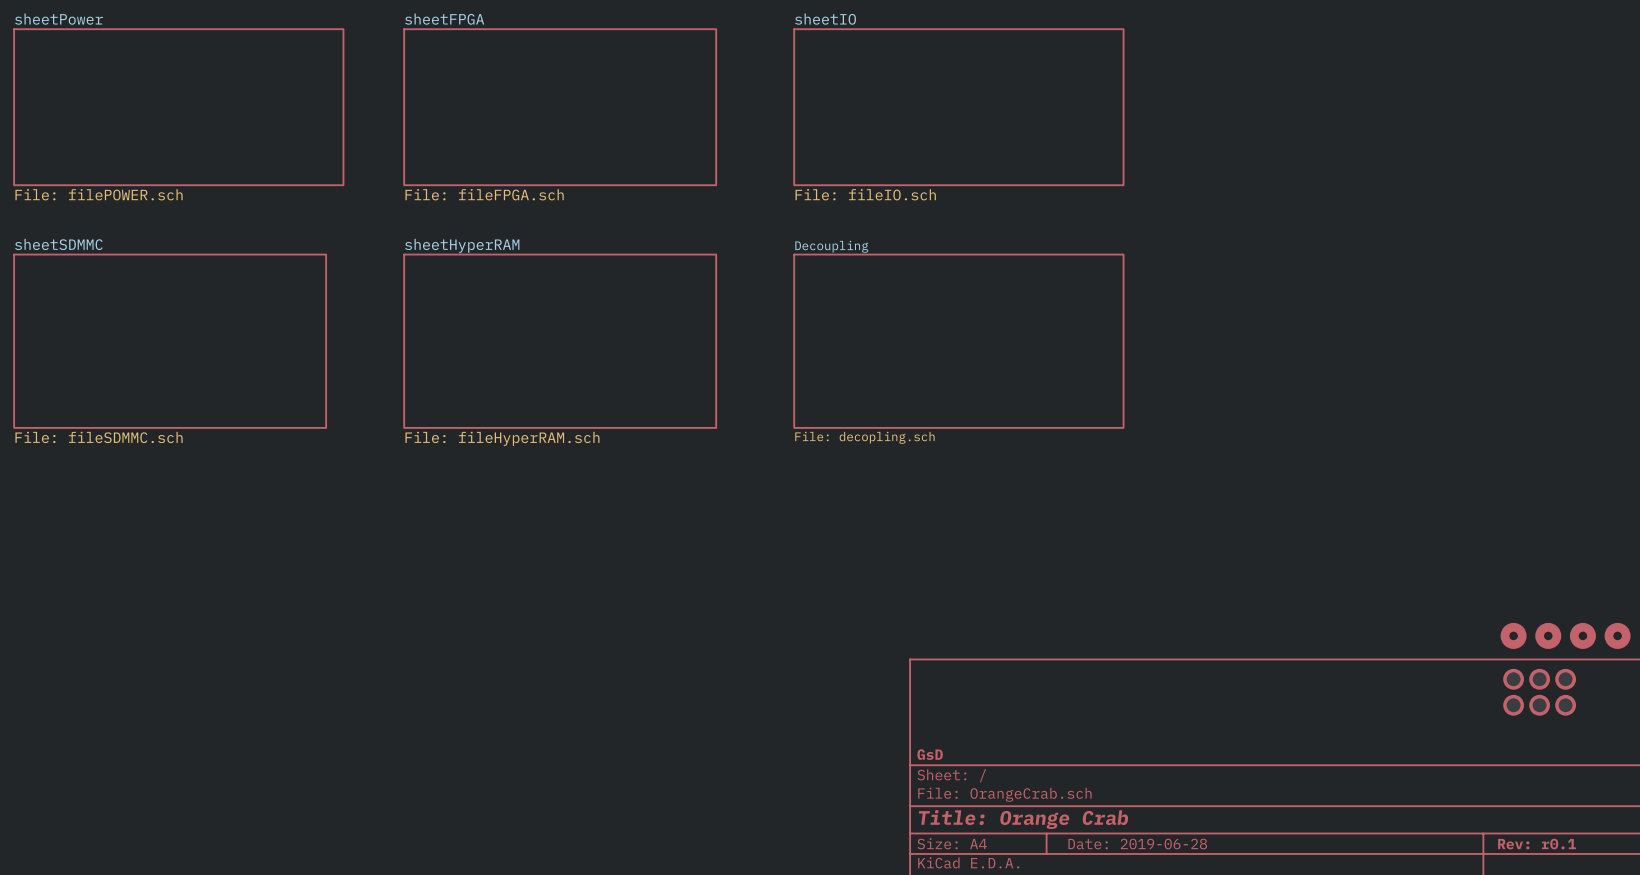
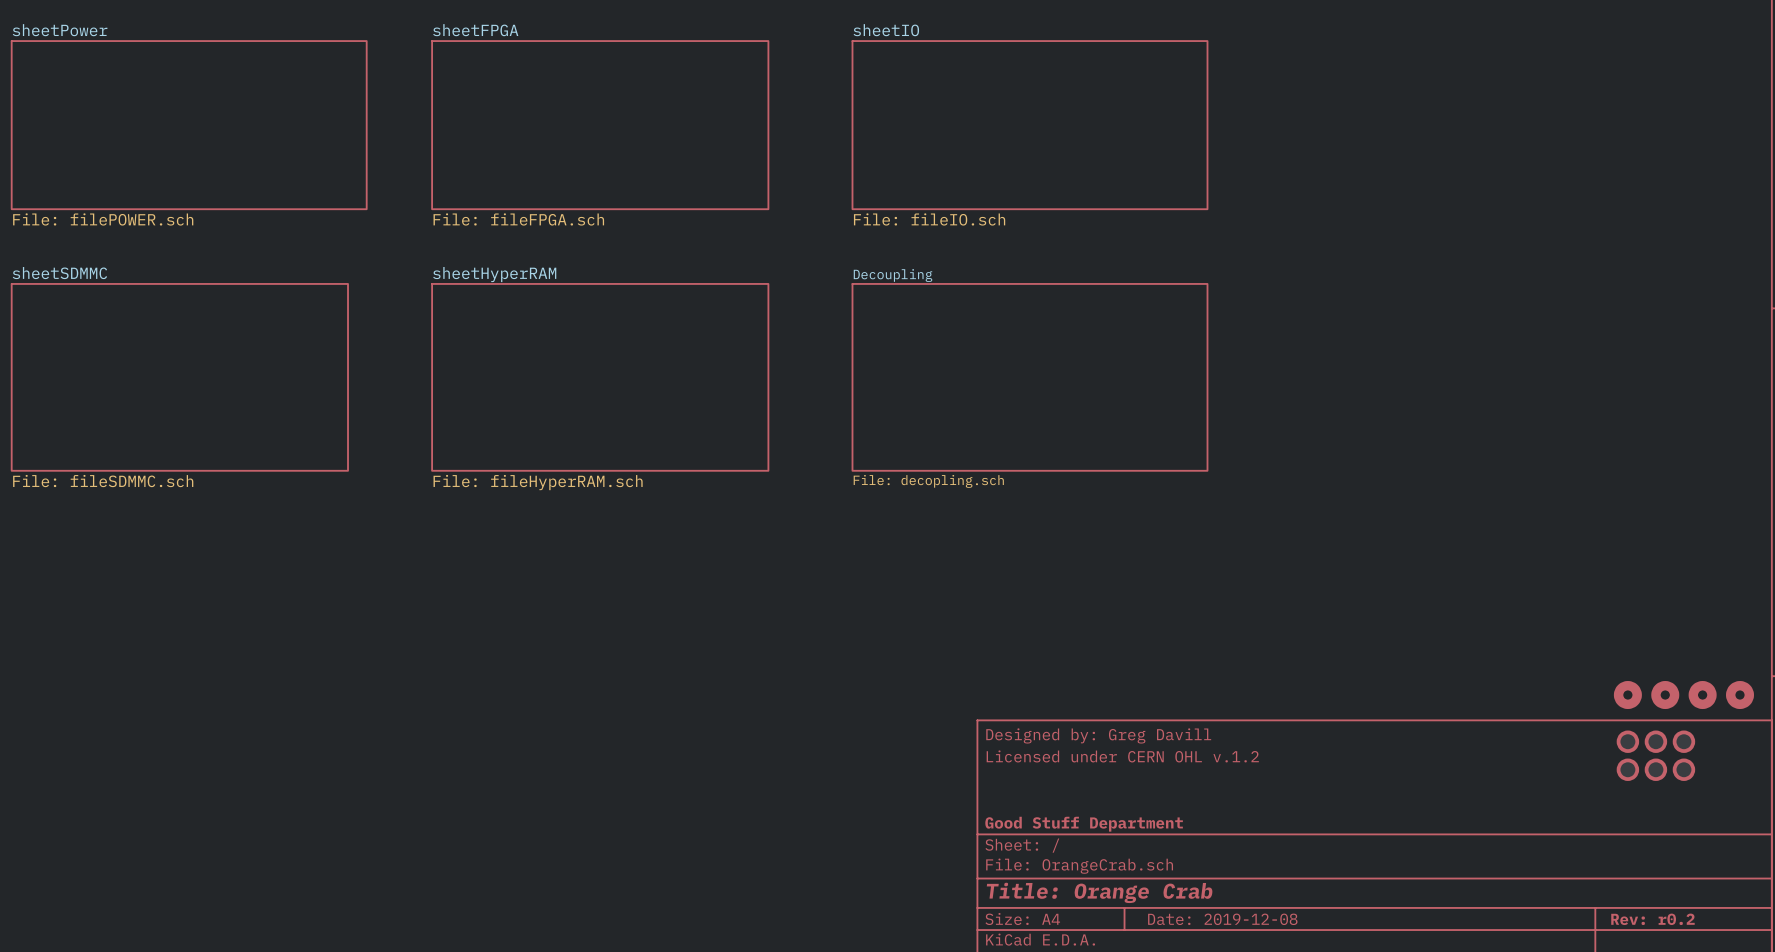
title block: none -> Designed by: Greg Davill (1098, 735)
title block: none -> Licensed under CERN OHL v.1.2 (1122, 756)
title block: GsD (930, 754) -> Good Stuff Department (1084, 824)
title block: Date: 2019-06-28 (1137, 844) -> Date: 2019-12-08 (1222, 919)
title block: Rev: r0.1 (1537, 844) -> Rev: r0.2 (1652, 919)

